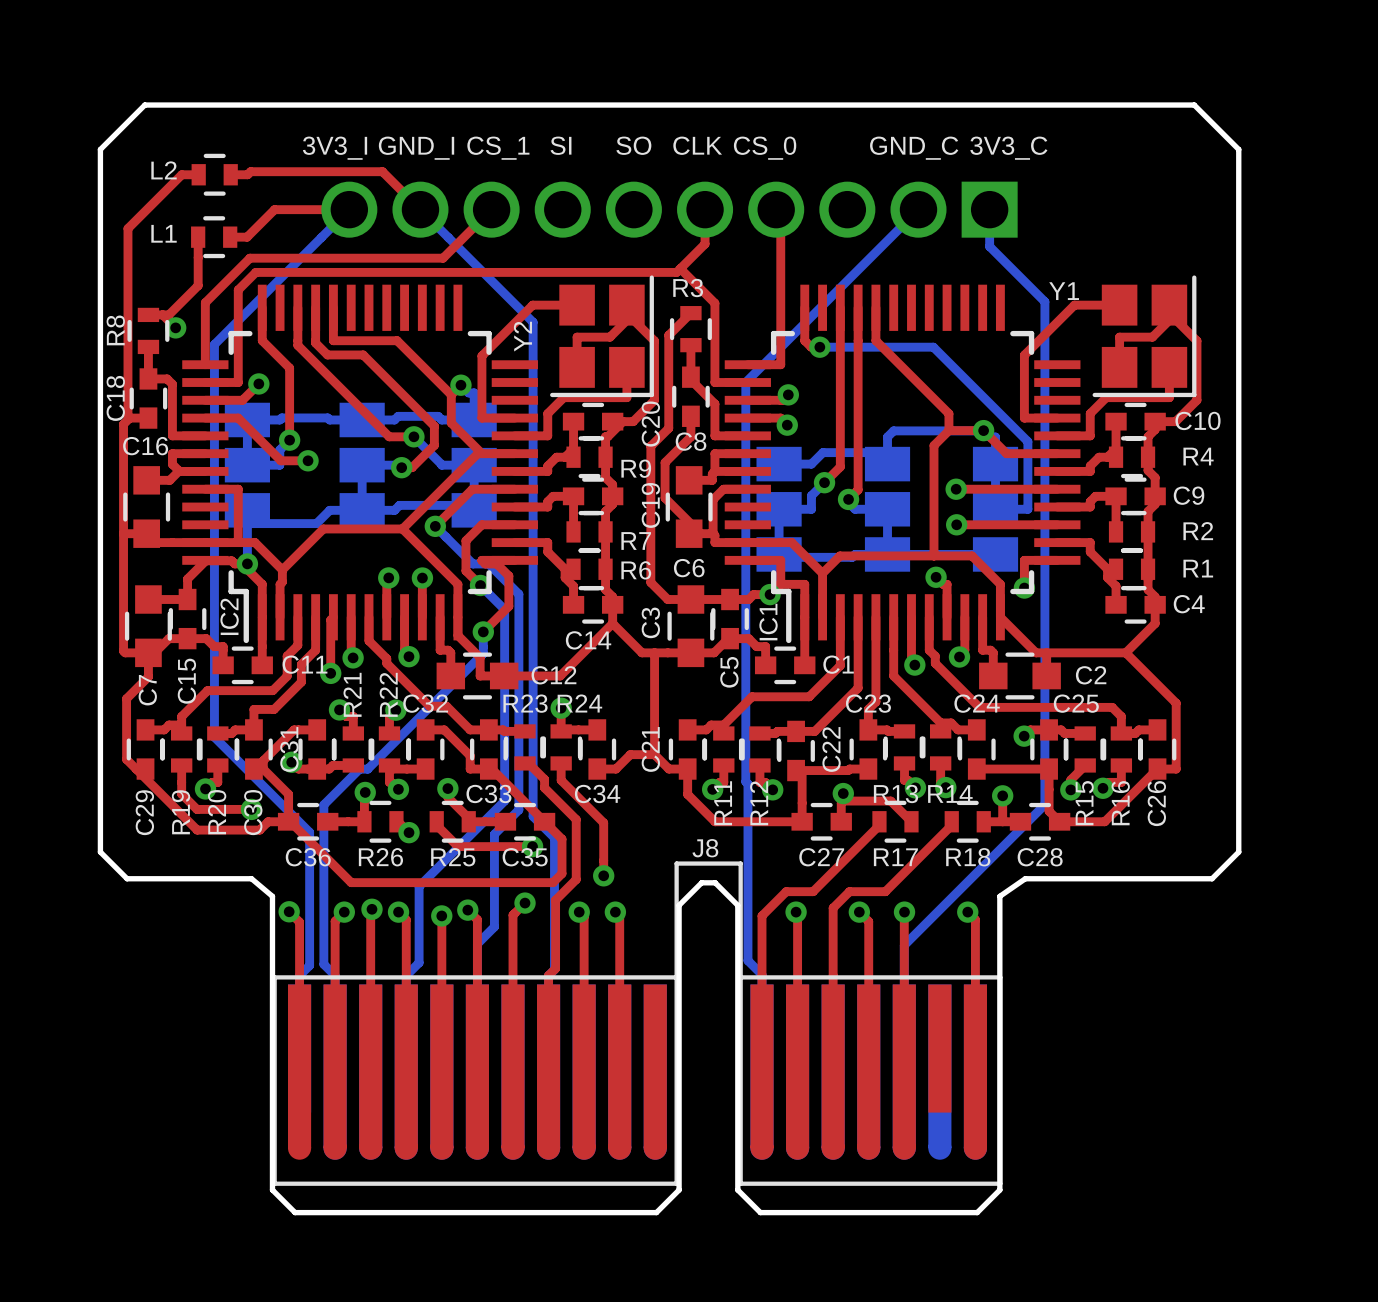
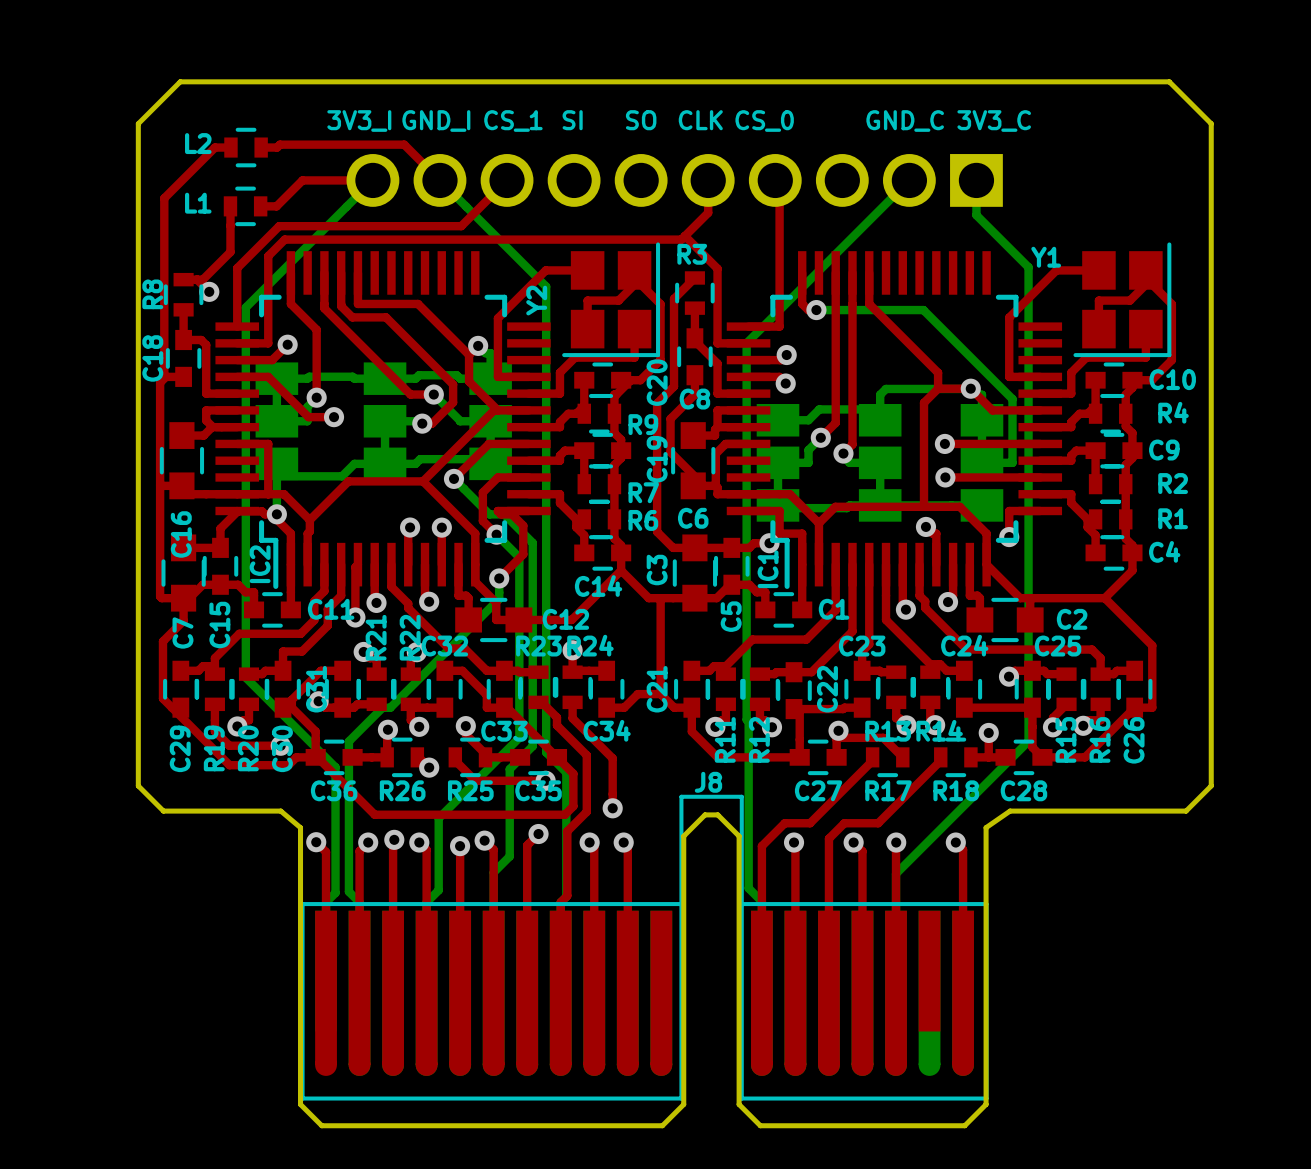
C16 name rotation: 0° (145, 446) -> 90° counterclockwise (181, 534)
C16 name position: C16 (145, 446) -> C16 (181, 534)

